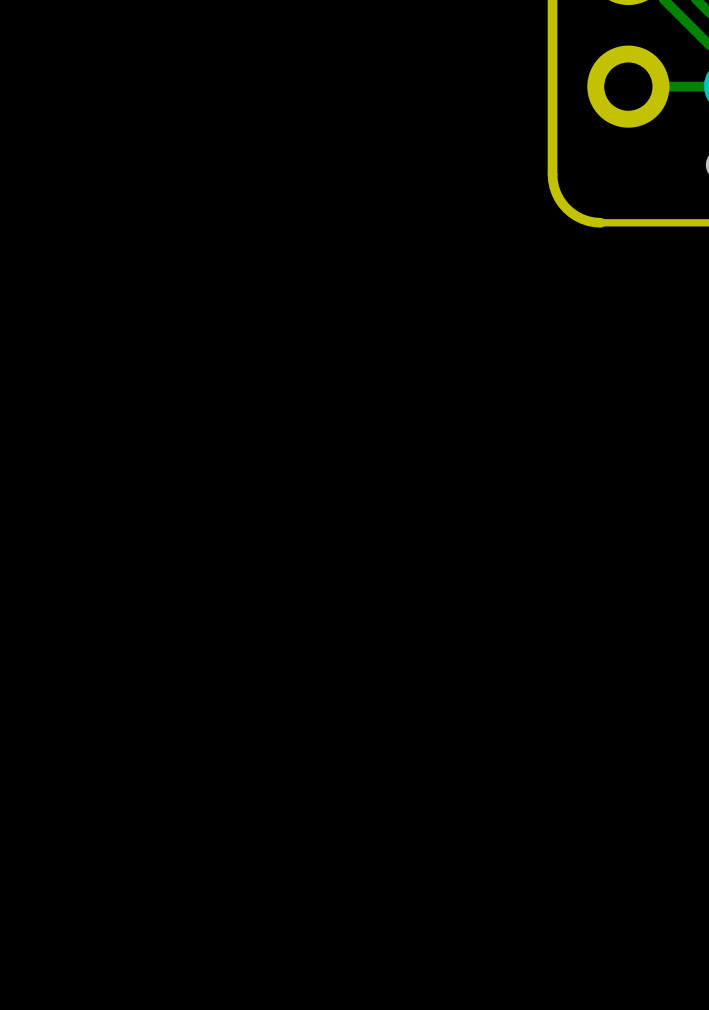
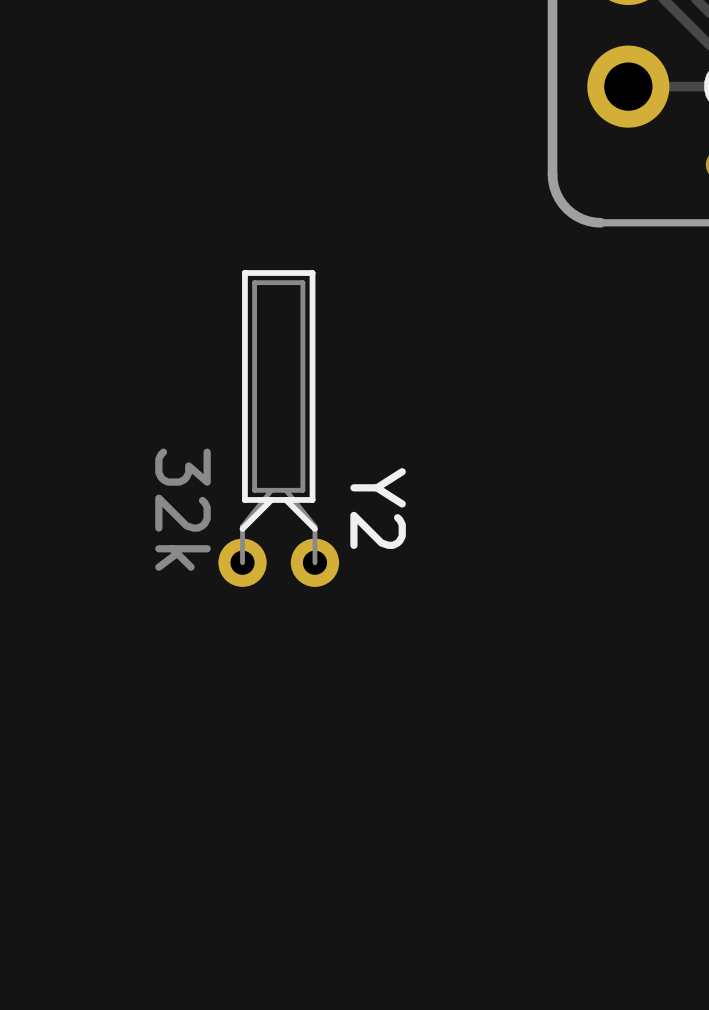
Y2: none -> 32k (278, 428)

